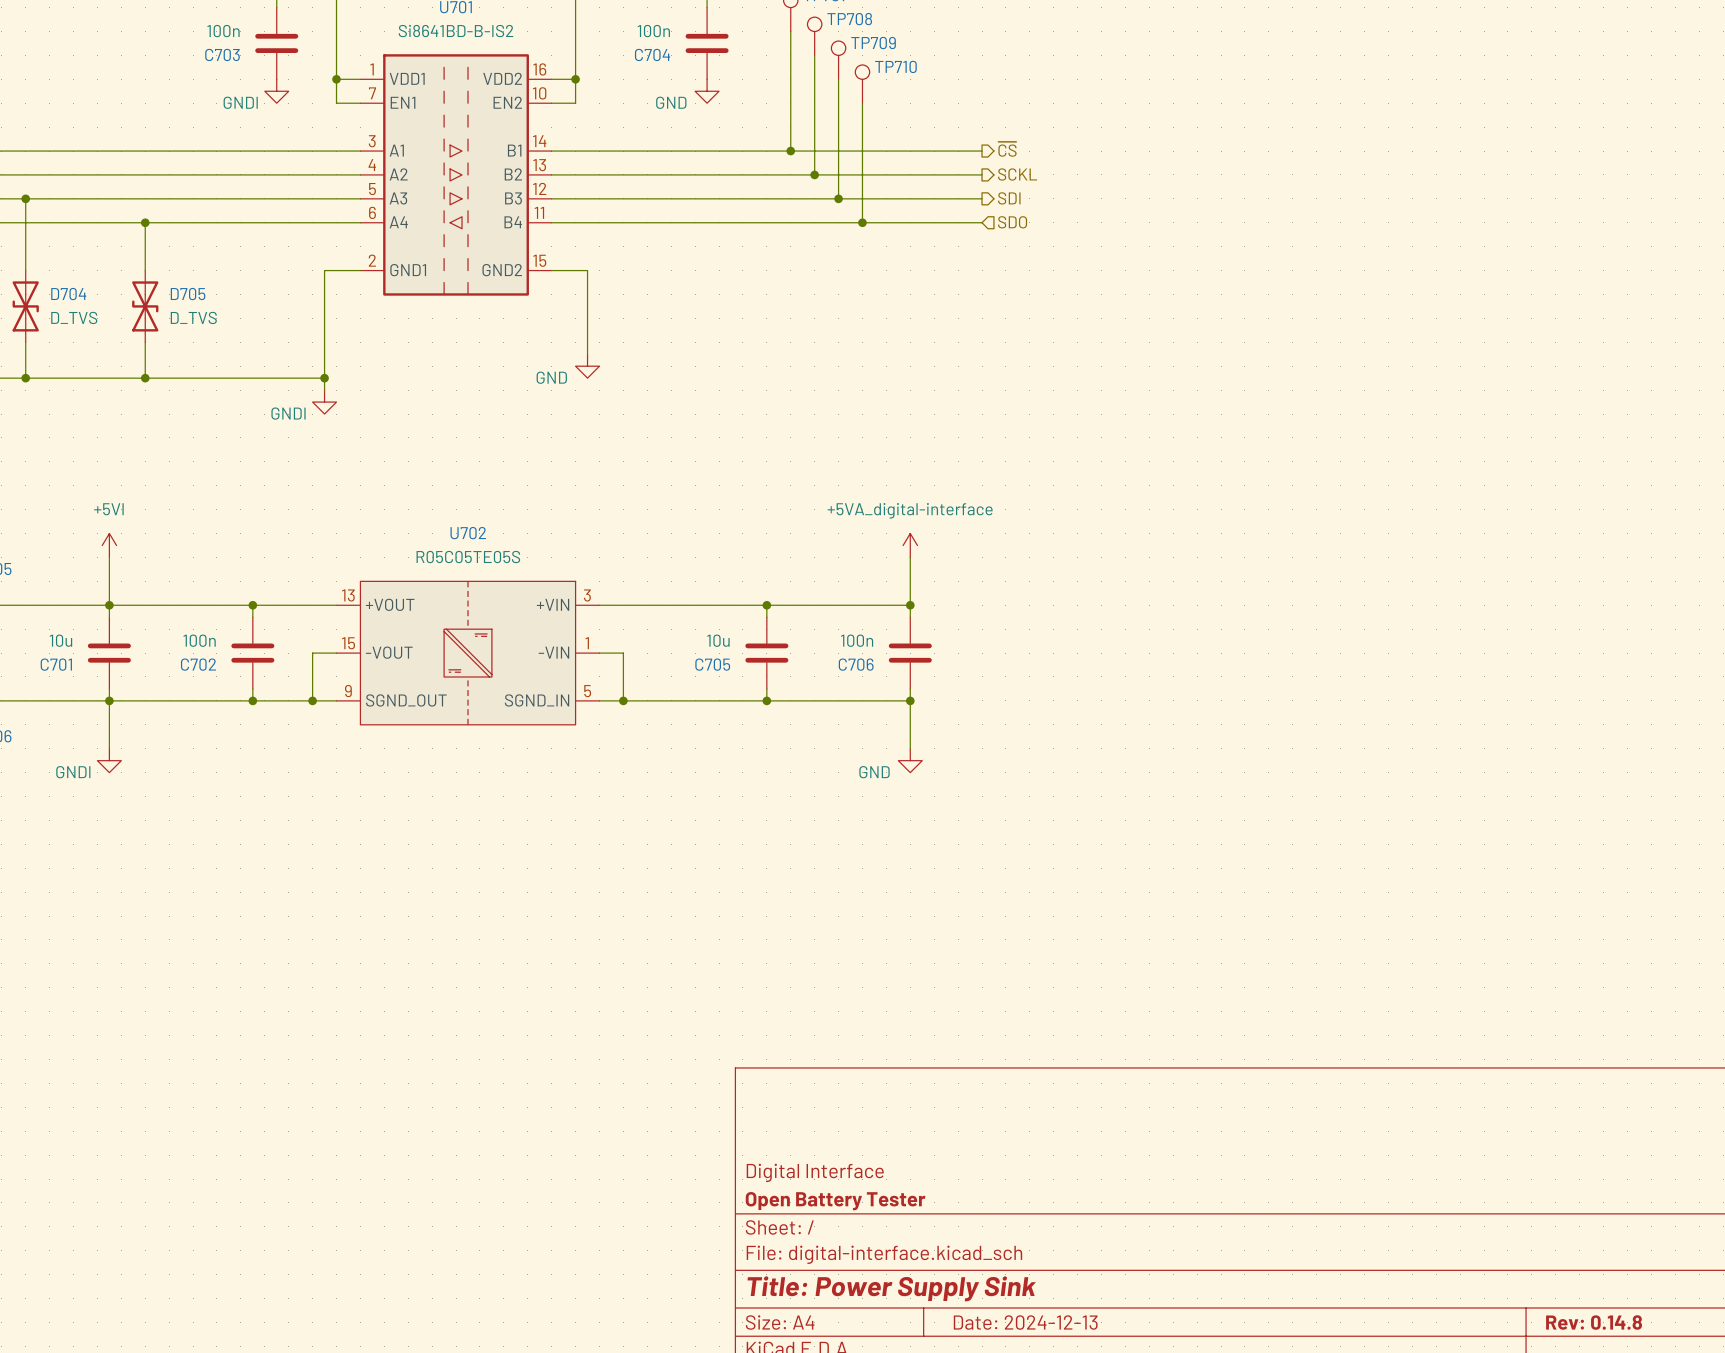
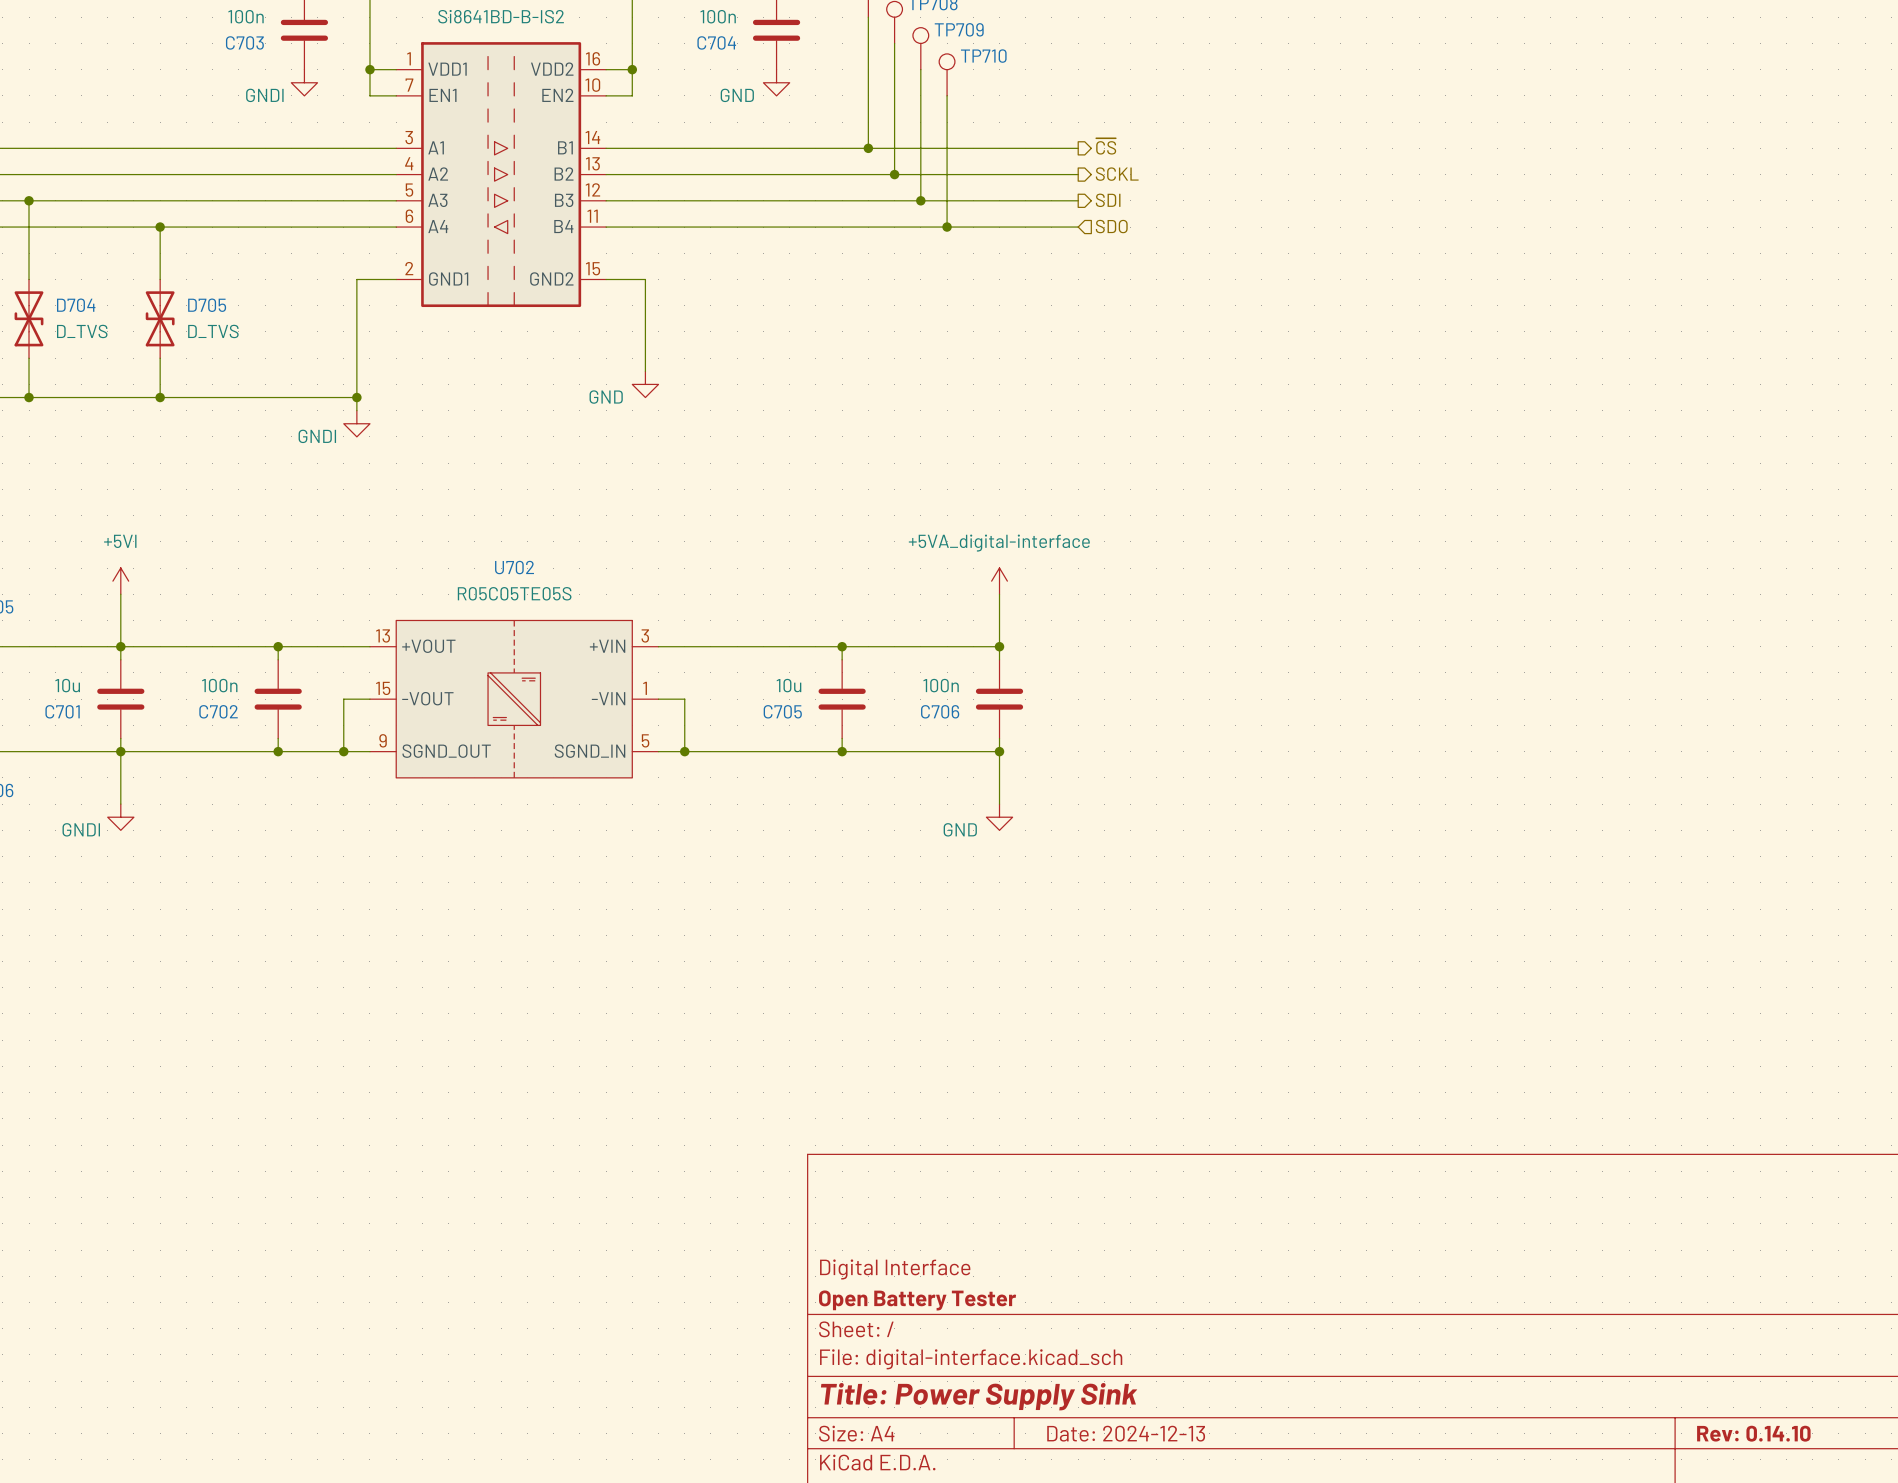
title block: Rev: 0.14.8 (1594, 1322) -> Rev: 0.14.10 (1753, 1433)

